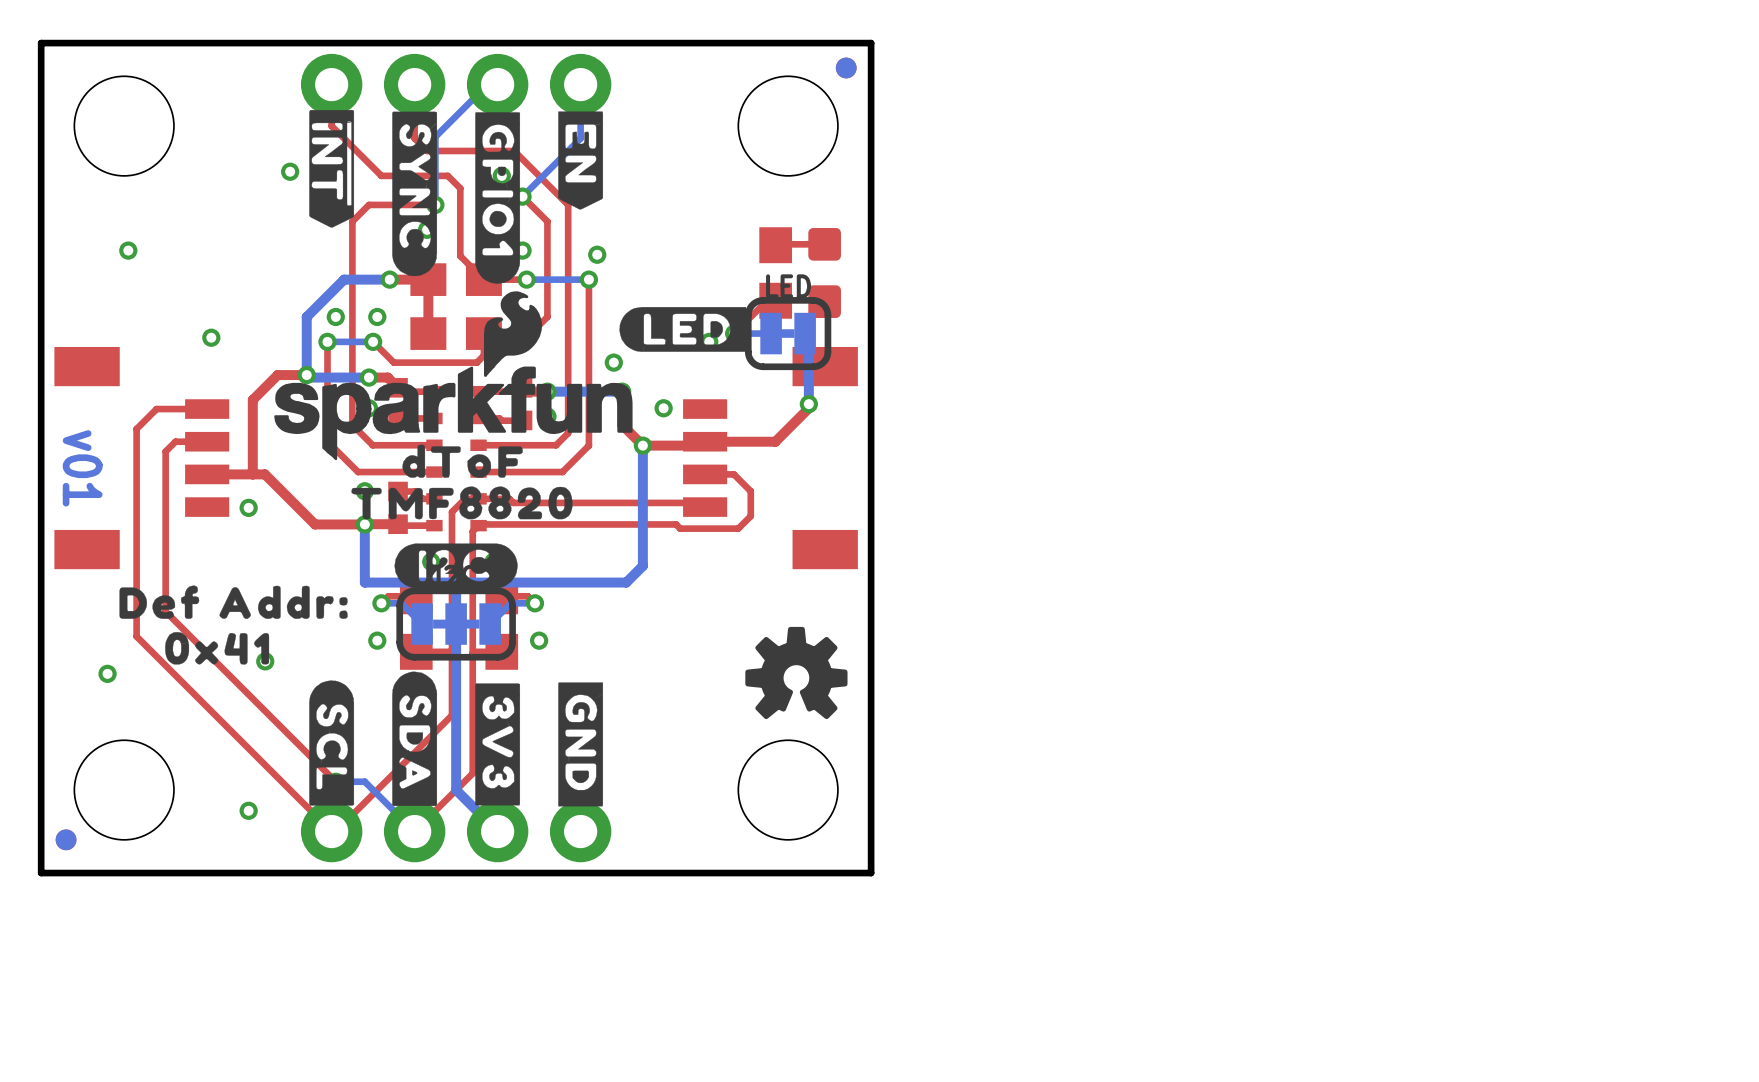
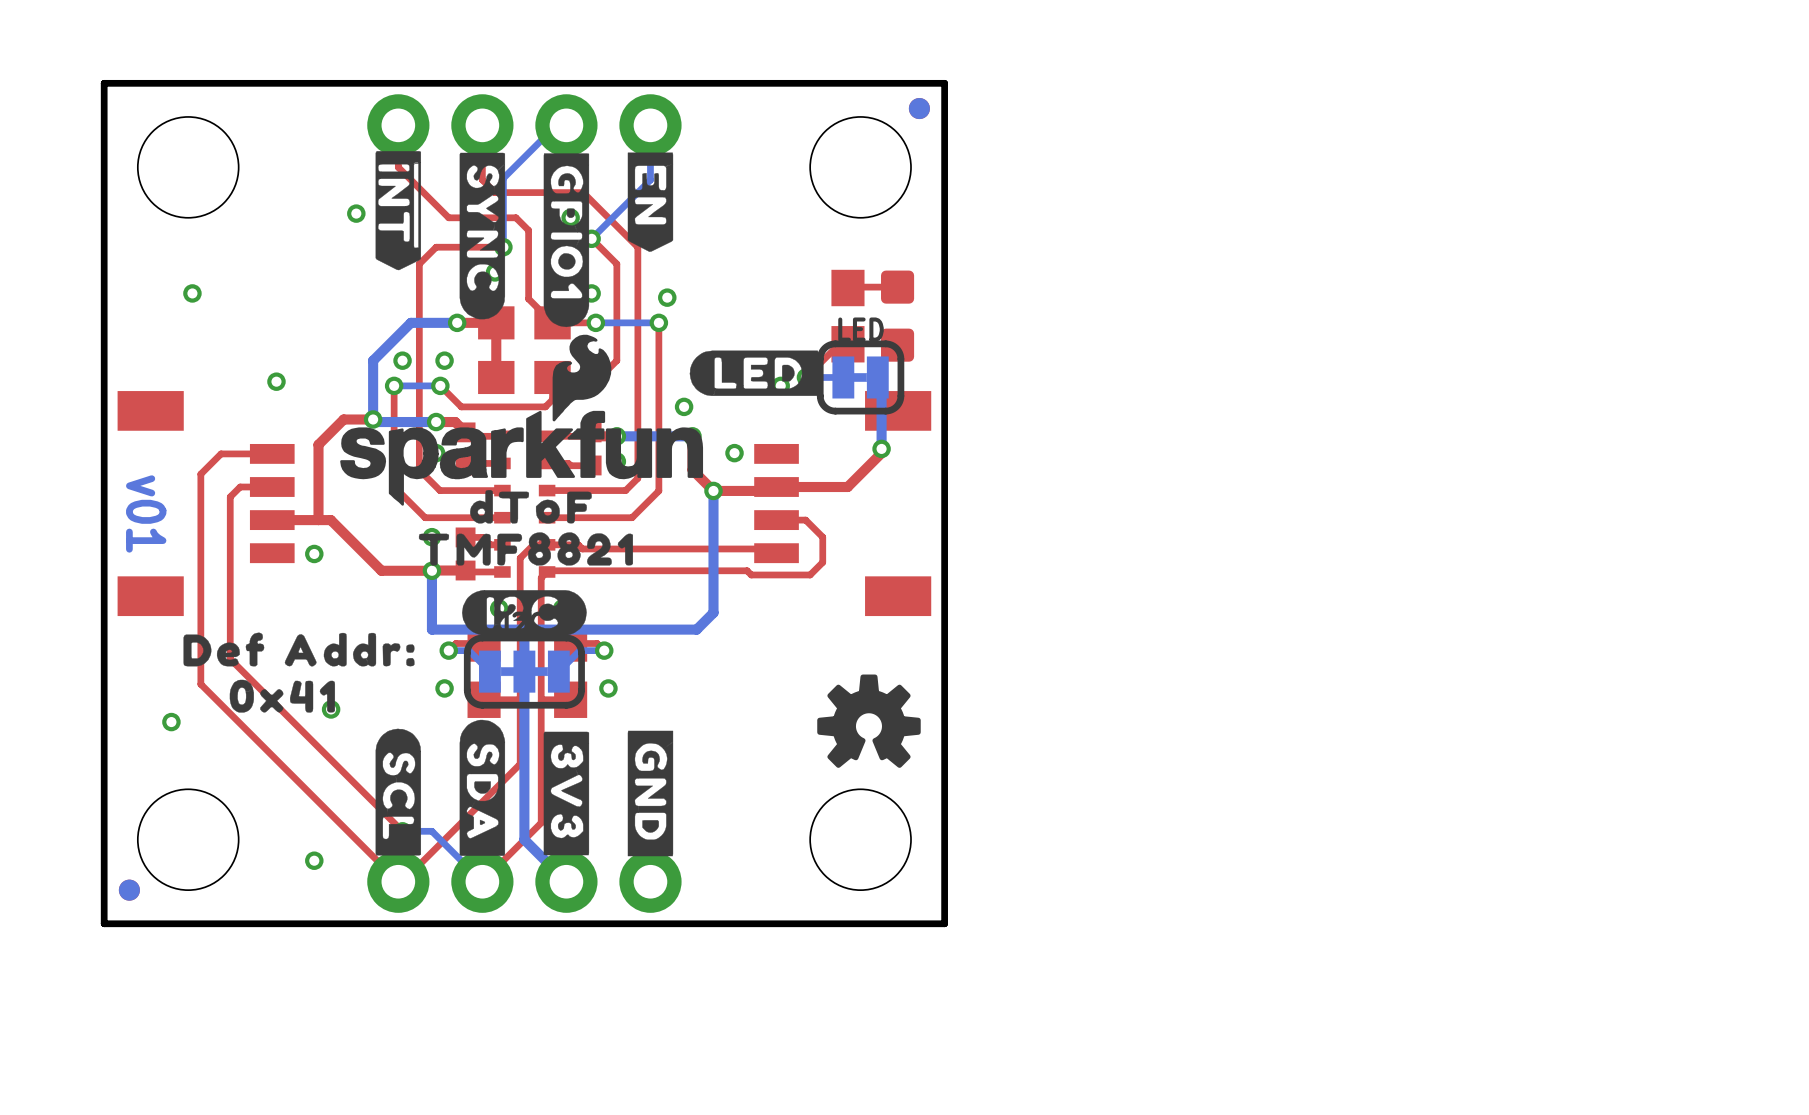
drawing shape: [351, 486, 573, 520] -> [418, 532, 634, 566]

